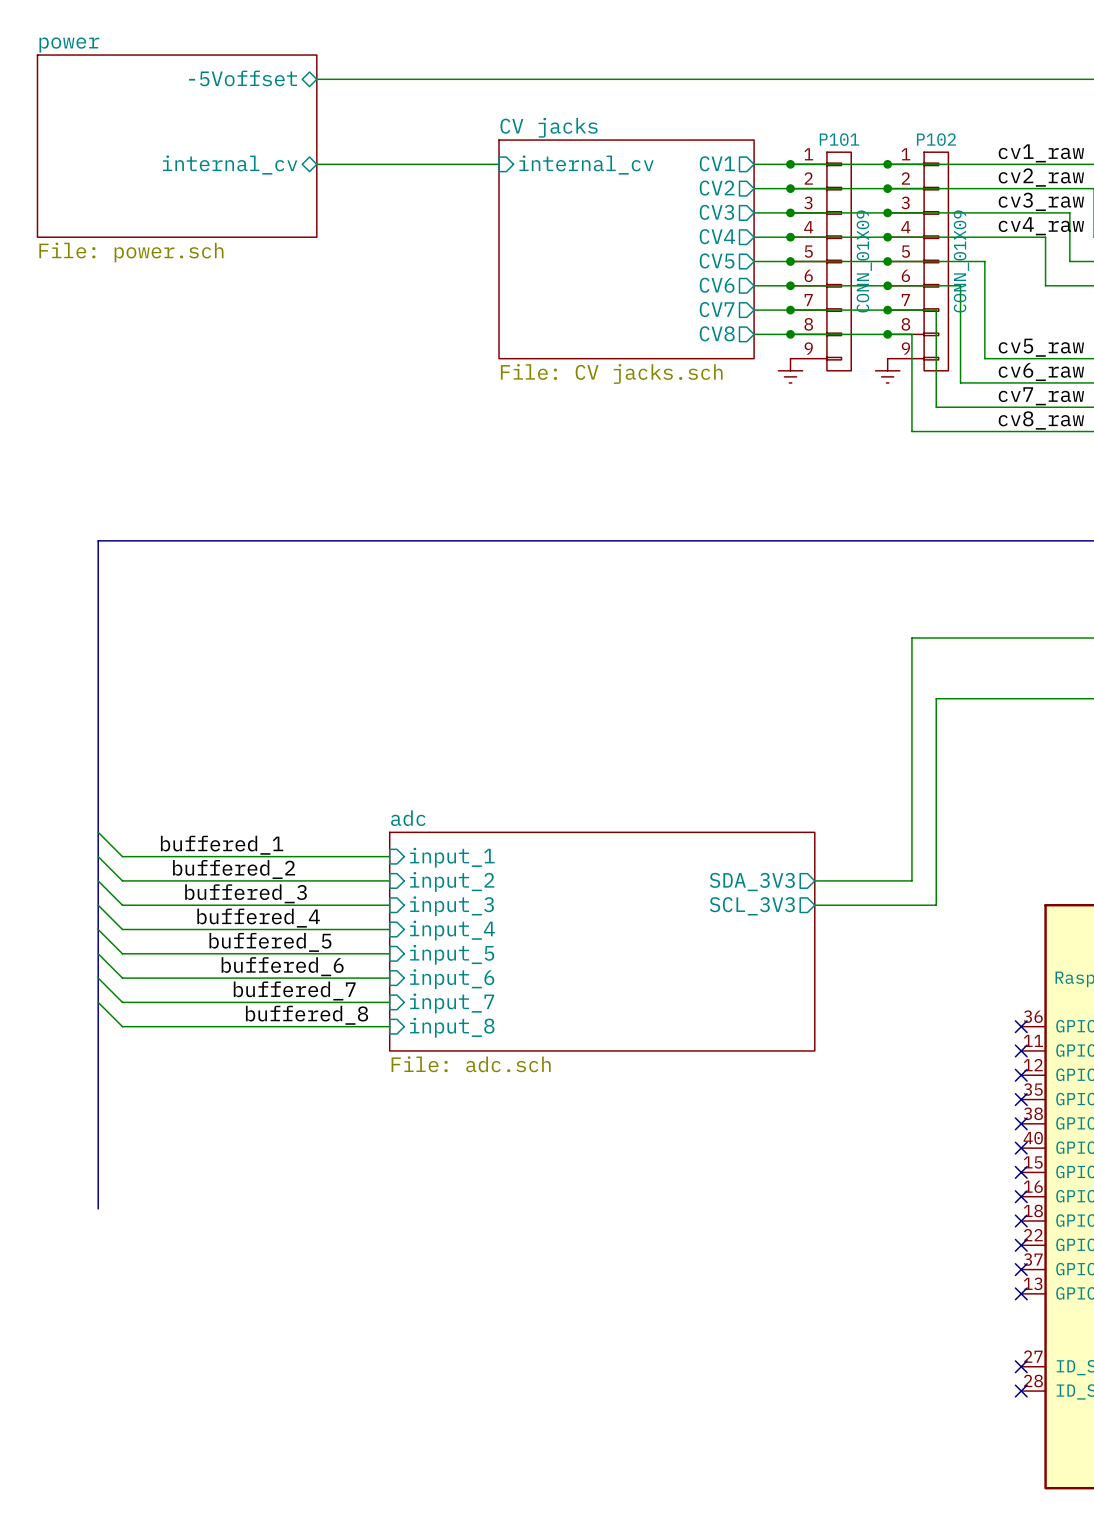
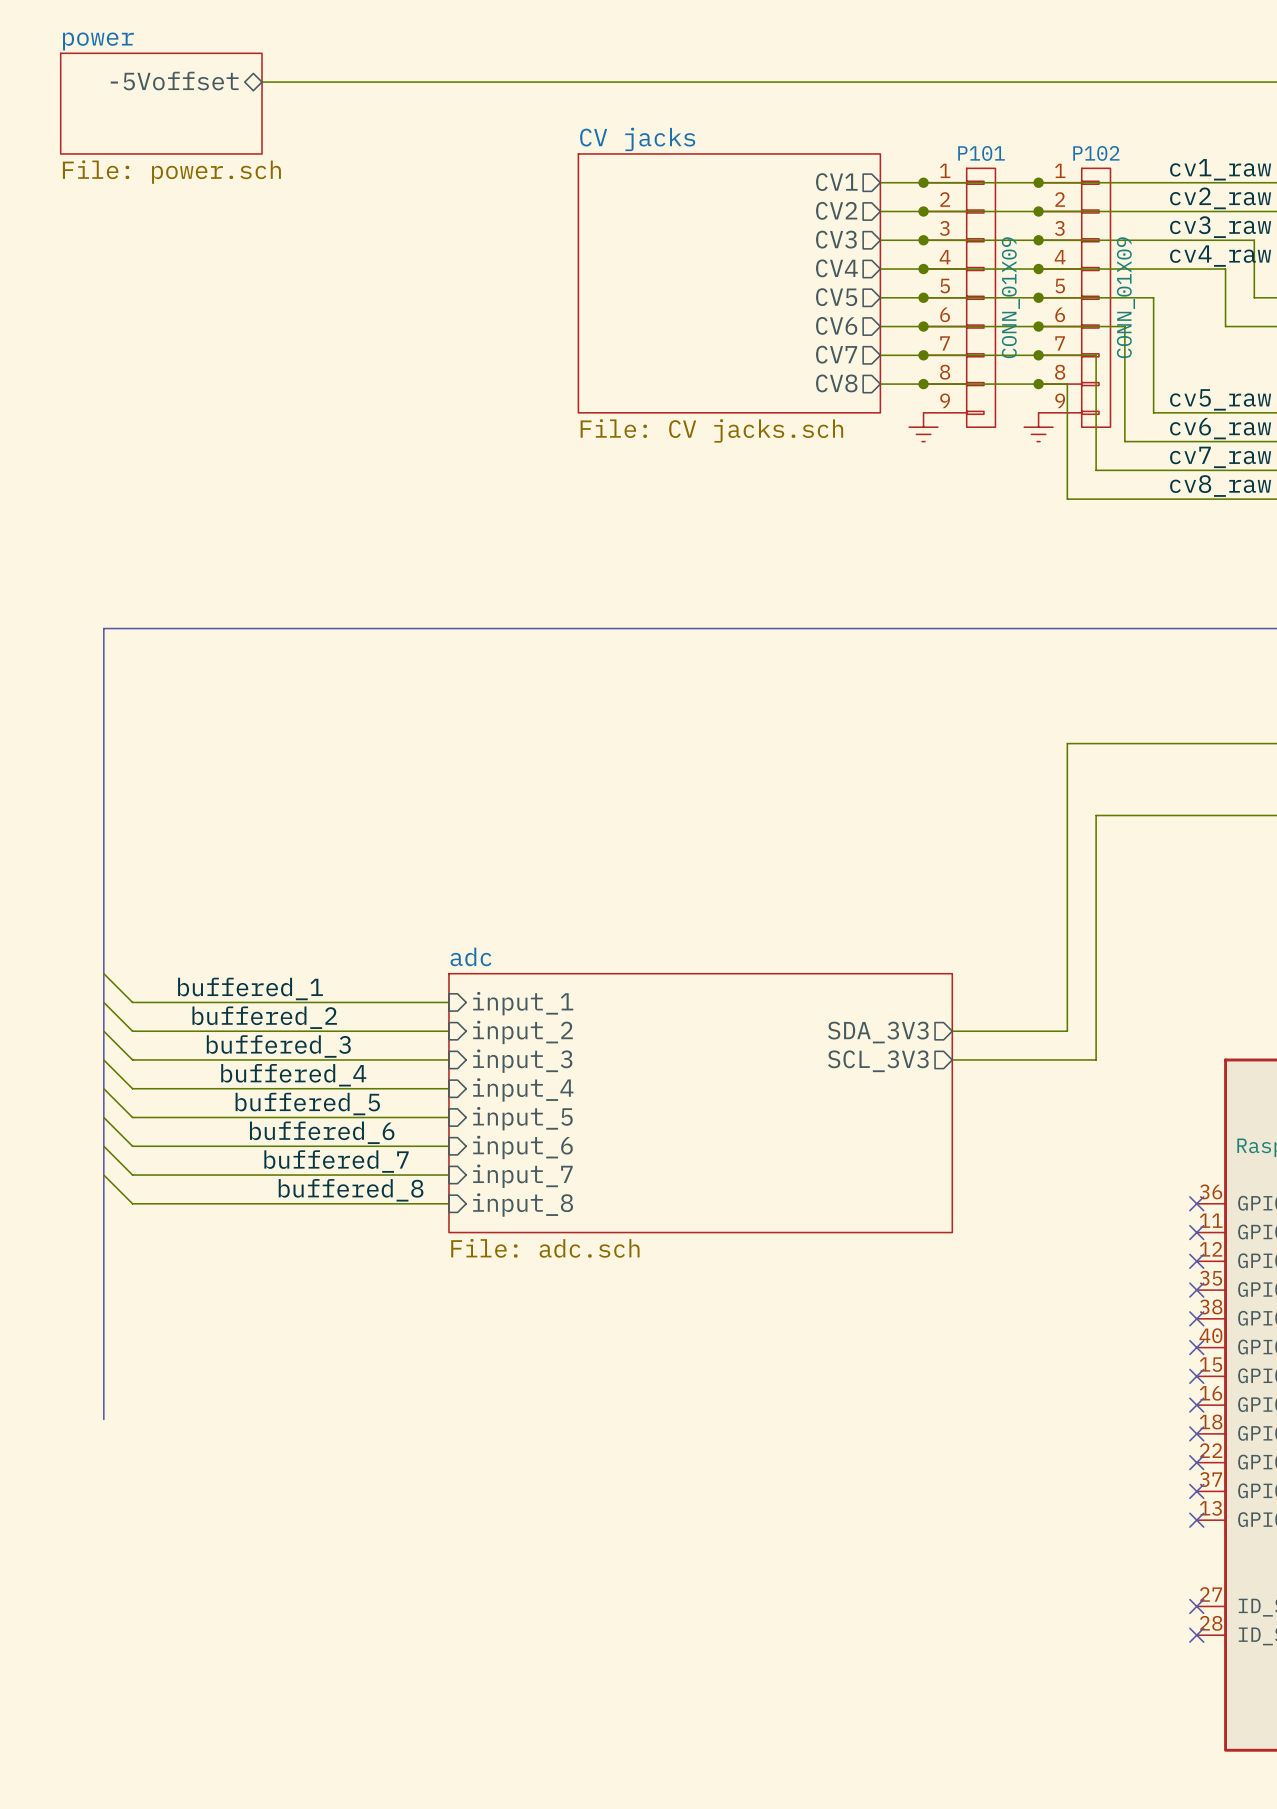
sheet pin position: -5Voffset (243, 78) -> -5Voffset (174, 81)
wire: none -> (262, 82) (362, 82)
sheet power: none -> File: power.sch (161, 103)
sheet power: File: power.sch (177, 146) -> none
wire: (316, 164) (499, 164) -> none
sheet pin: internal_cv (230, 165) -> none
sheet pin: internal_cv (586, 165) -> none

